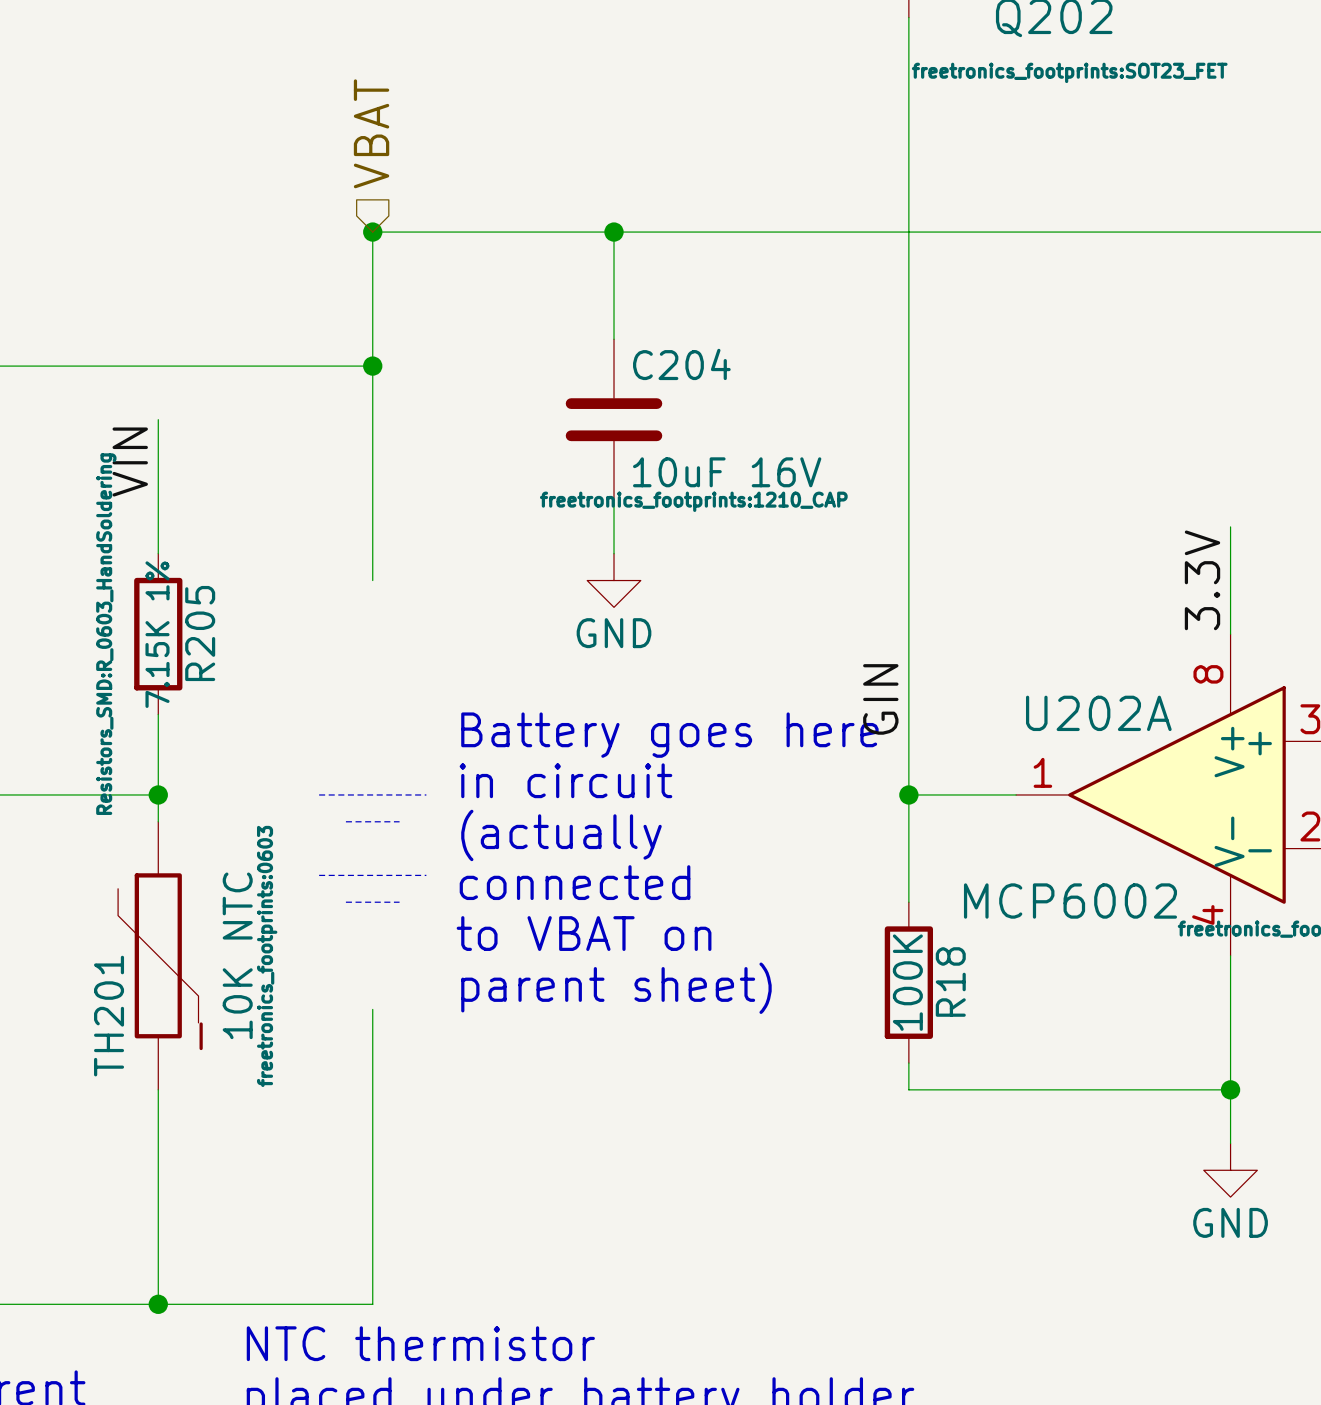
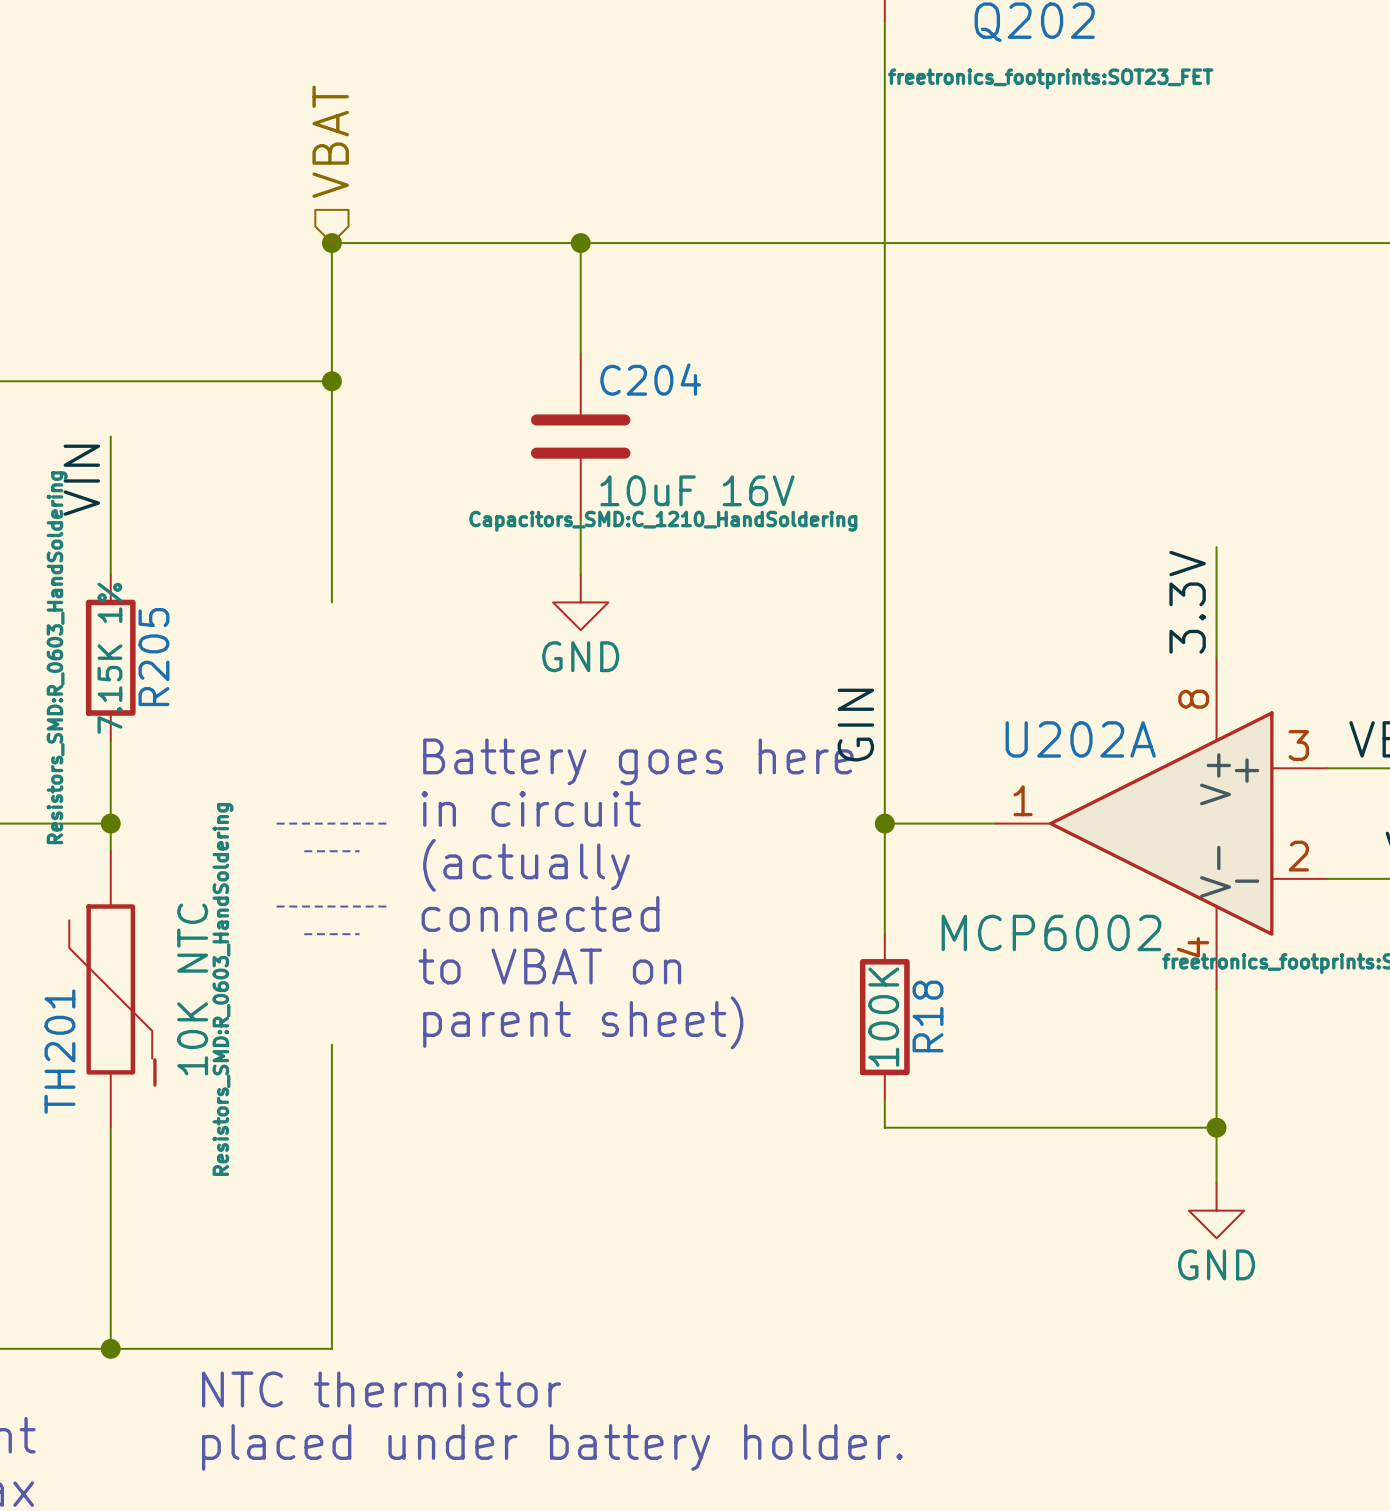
C204 text: freetronics_footprints:1210_CAP (693, 501) -> Capacitors_SMD:C_1210_HandSoldering (663, 521)
TH201 text: freetronics_footprints:0603 (267, 956) -> Resistors_SMD:R_0603_HandSoldering (223, 989)

